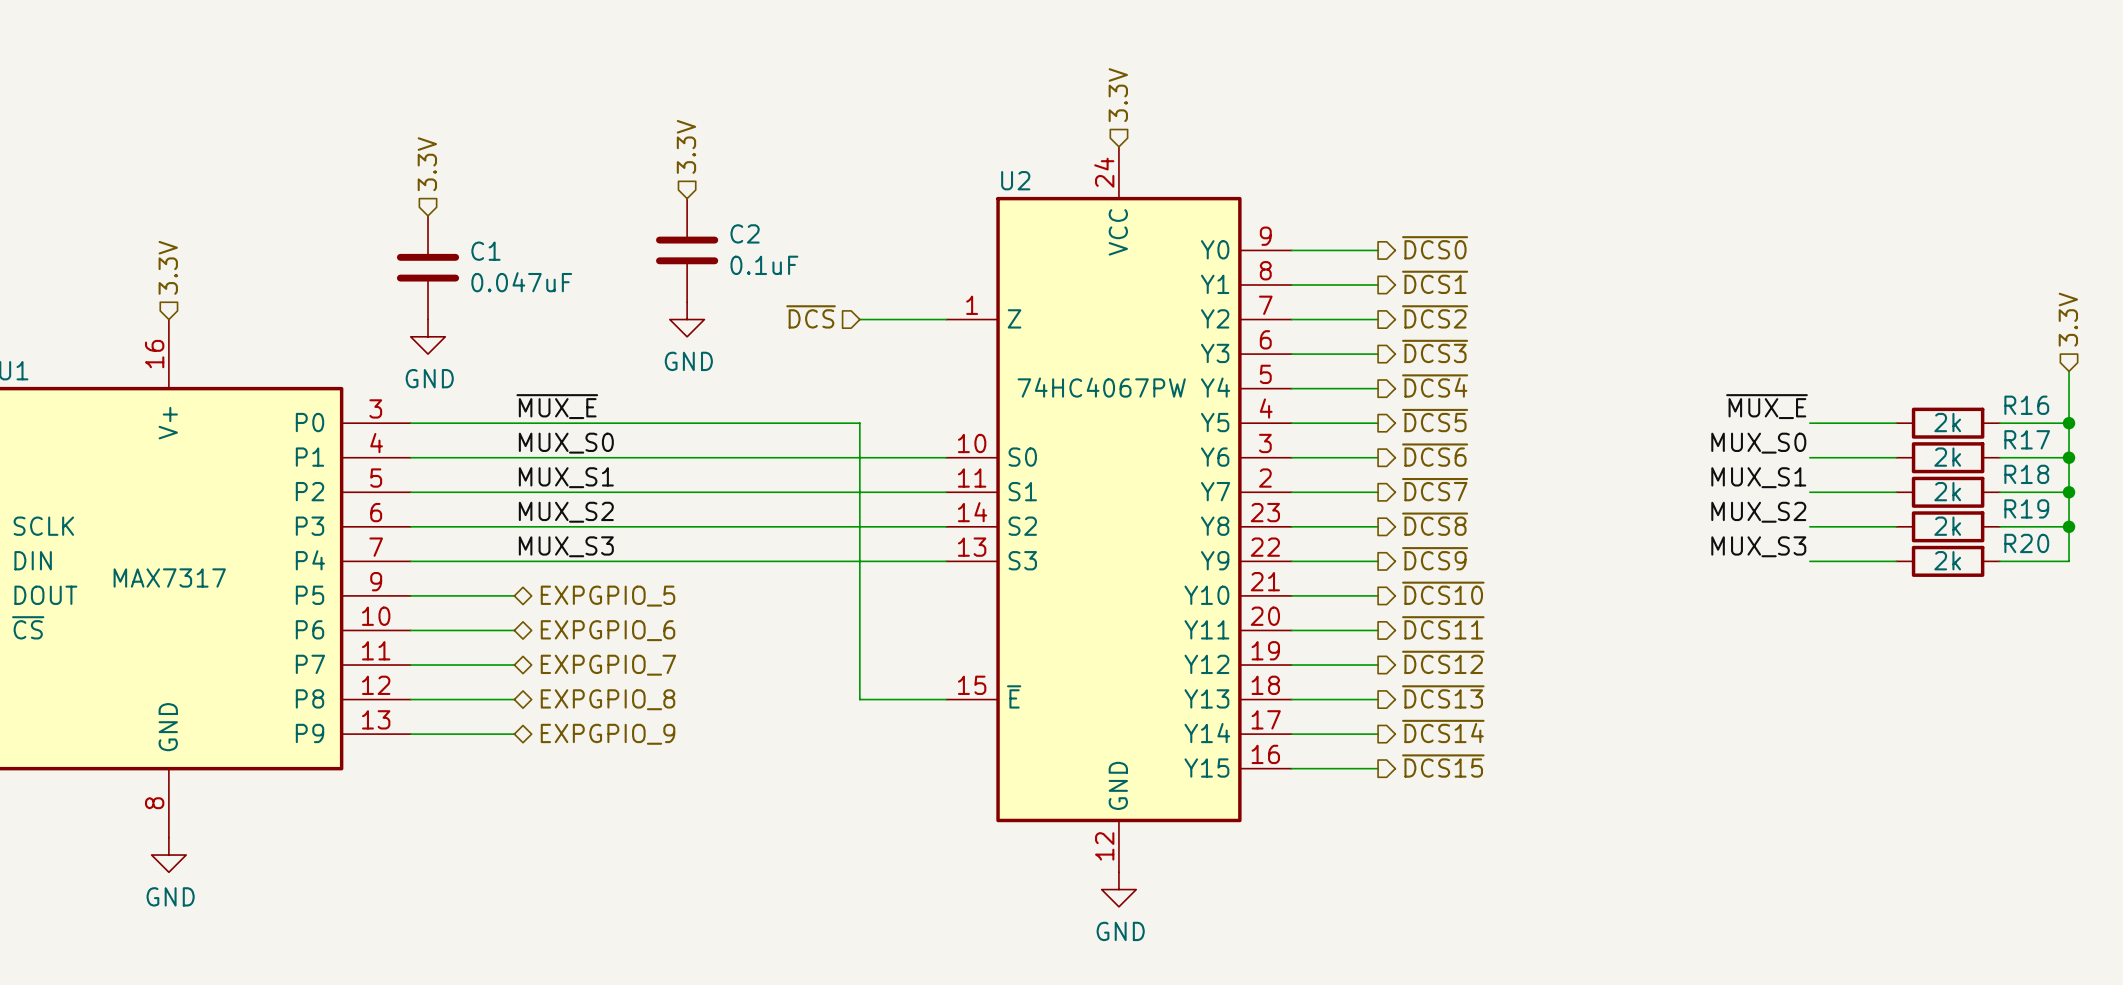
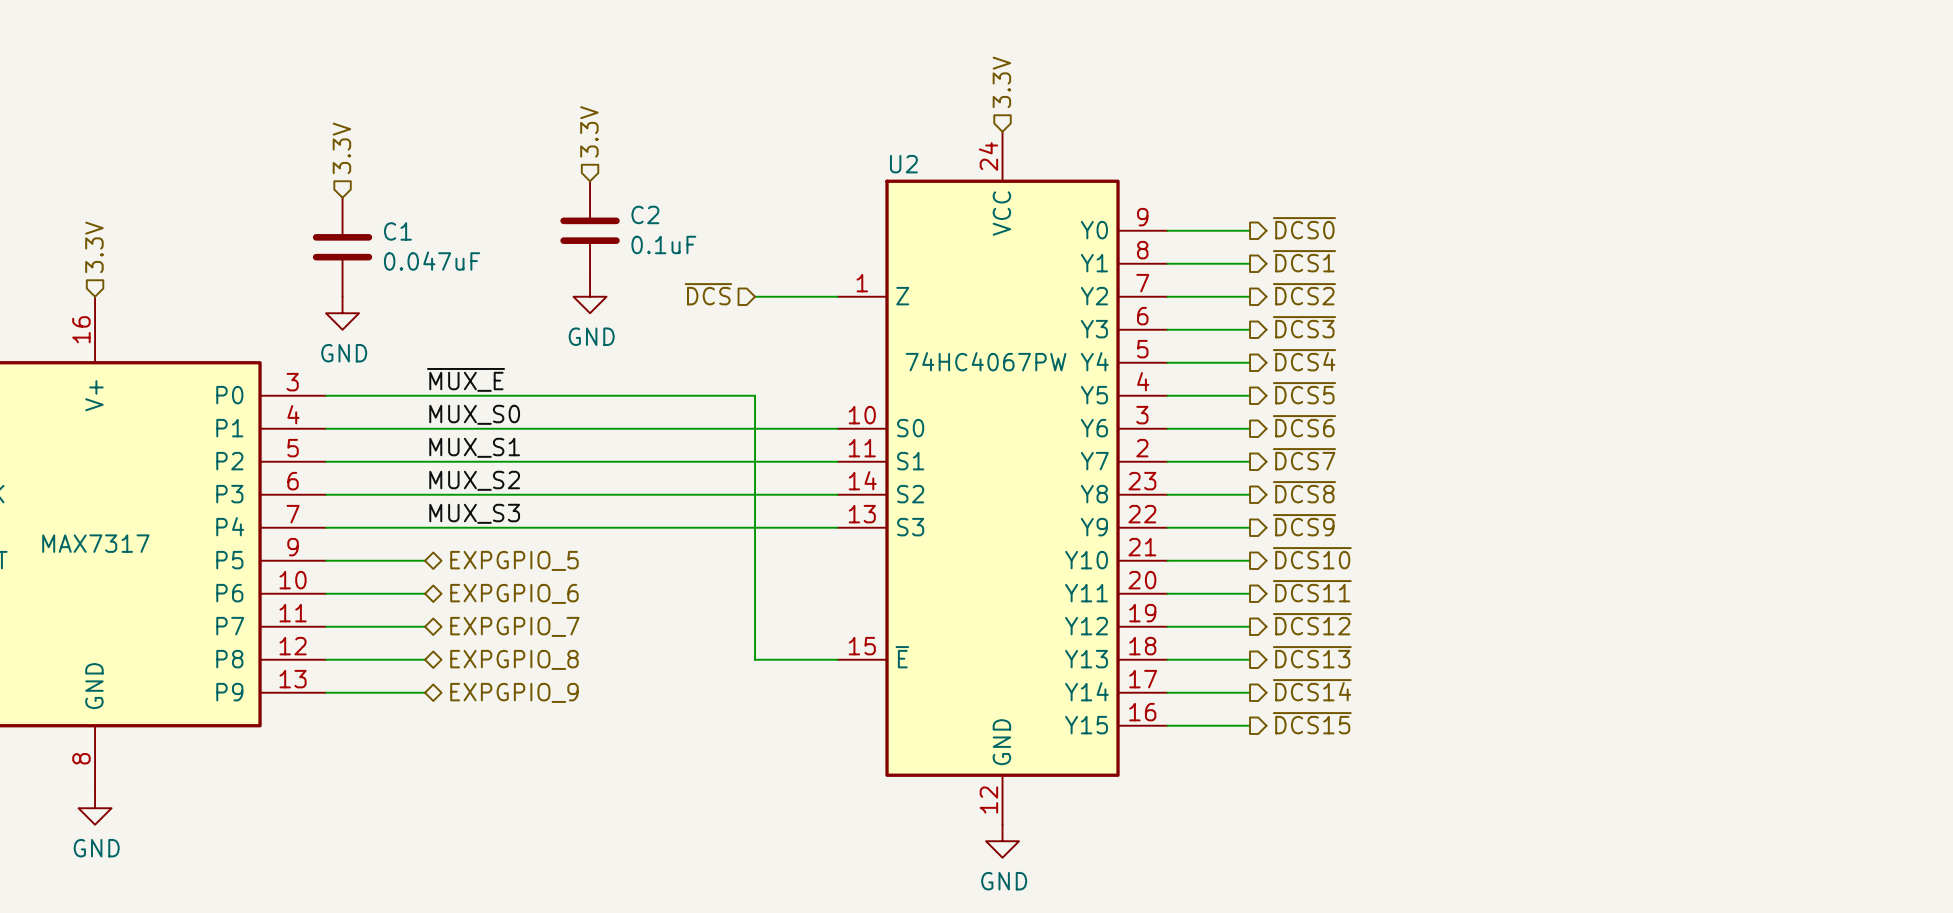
hierarchical label: 3.3V (2068, 319) -> none
wire: (2069, 371) (2069, 561) (1999, 561) -> none
label: ~{MUX_E} (1767, 406) -> none
wire: (1809, 423) (1896, 423) -> none
R16: 2k (1948, 423) -> none
wire: (1999, 423) (2069, 423) -> none
junction: (2069, 423) -> none
label: MUX_S0 (1758, 443) -> none
wire: (1809, 457) (1896, 457) -> none
R17: 2k (1948, 457) -> none
wire: (1999, 457) (2069, 457) -> none
junction: (2069, 457) -> none
label: MUX_S1 (1758, 477) -> none
wire: (1809, 492) (1896, 492) -> none
R18: 2k (1948, 492) -> none
wire: (1999, 492) (2069, 492) -> none
junction: (2069, 492) -> none
label: MUX_S2 (1758, 512) -> none
wire: (1809, 526) (1896, 526) -> none
R19: 2k (1948, 526) -> none
wire: (1999, 526) (2069, 526) -> none
junction: (2069, 526) -> none
label: MUX_S3 (1758, 546) -> none
wire: (1809, 561) (1896, 561) -> none
R20: 2k (1948, 561) -> none

